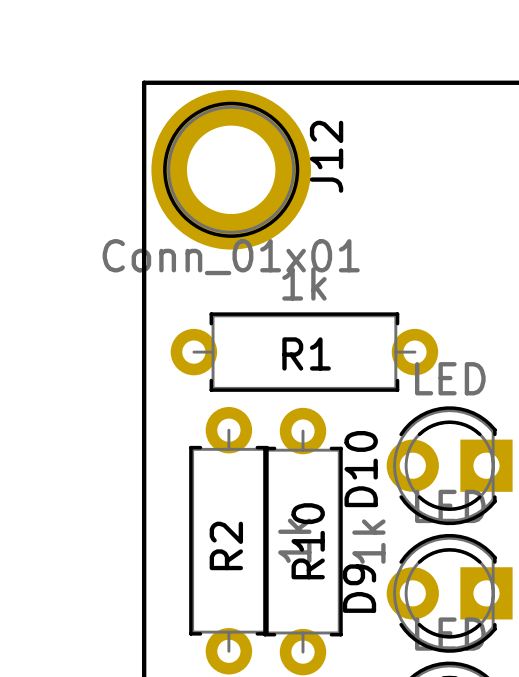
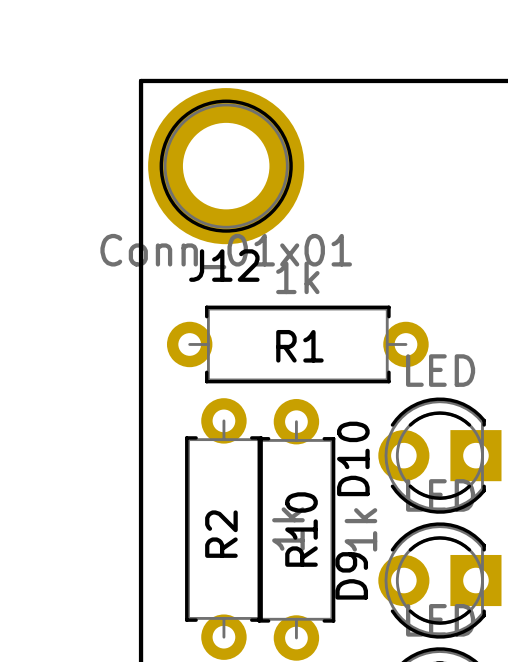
J12 name rotation: 0° (326, 156) -> 90° clockwise (224, 265)
J12 name position: J12 (326, 156) -> J12 (224, 265)

